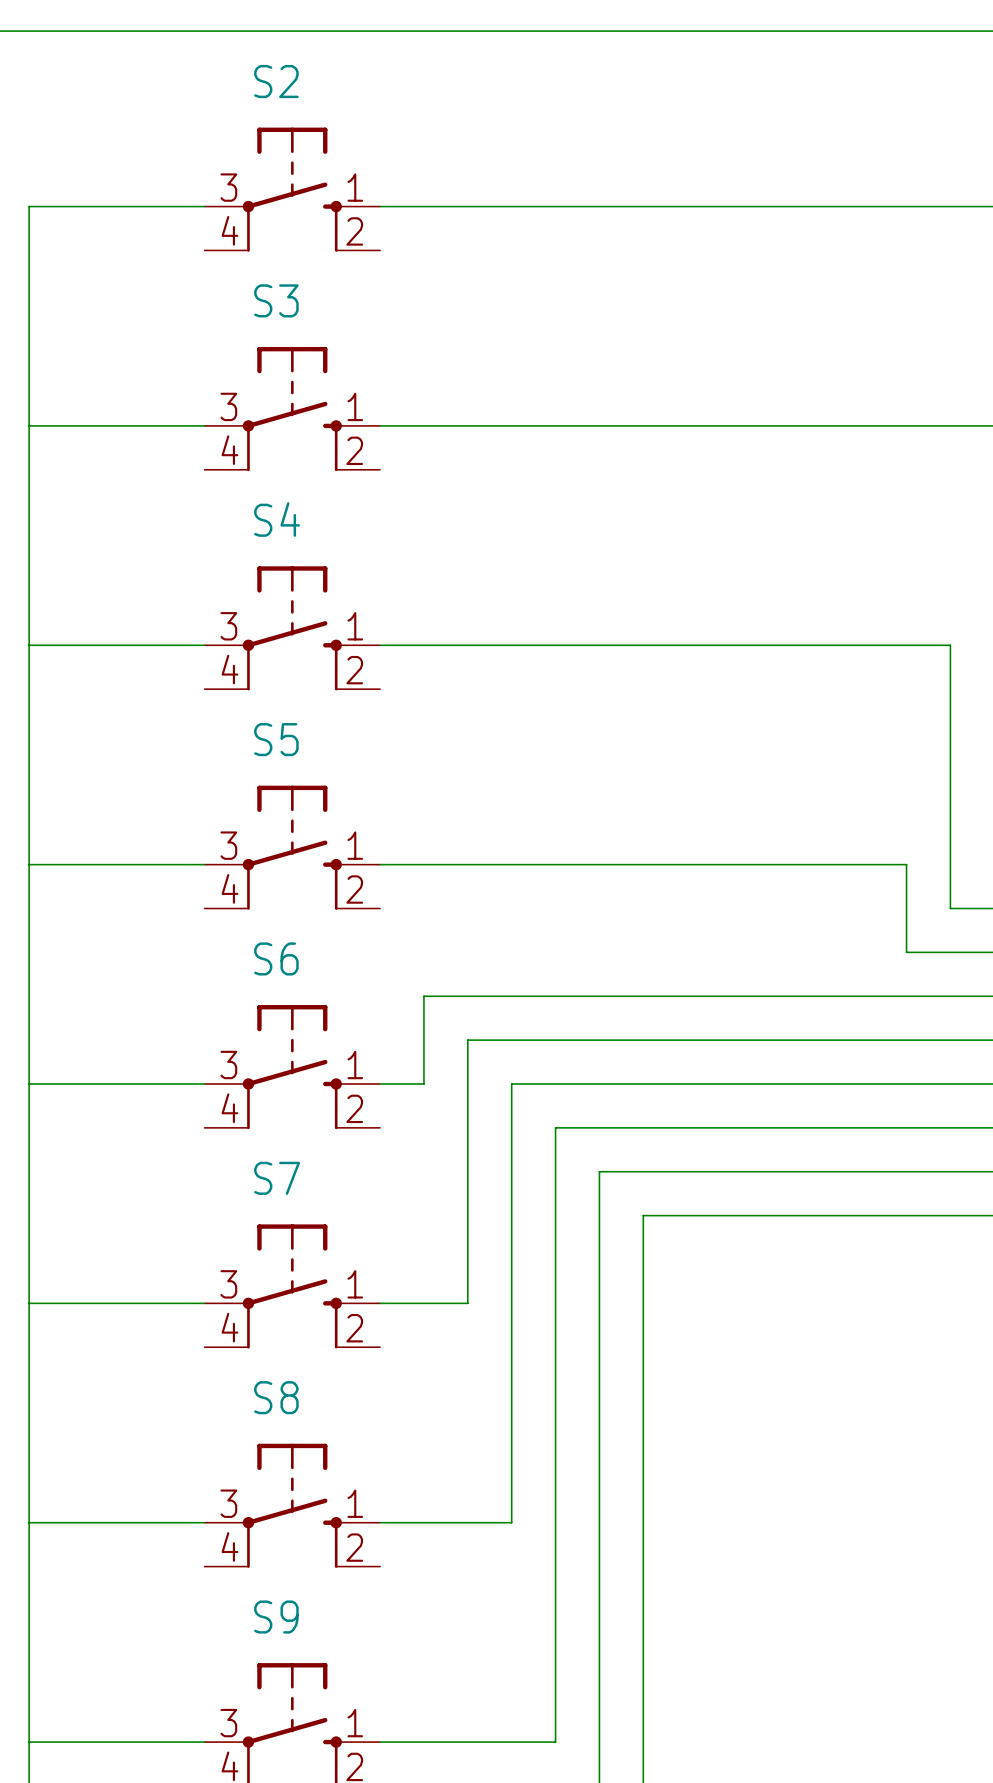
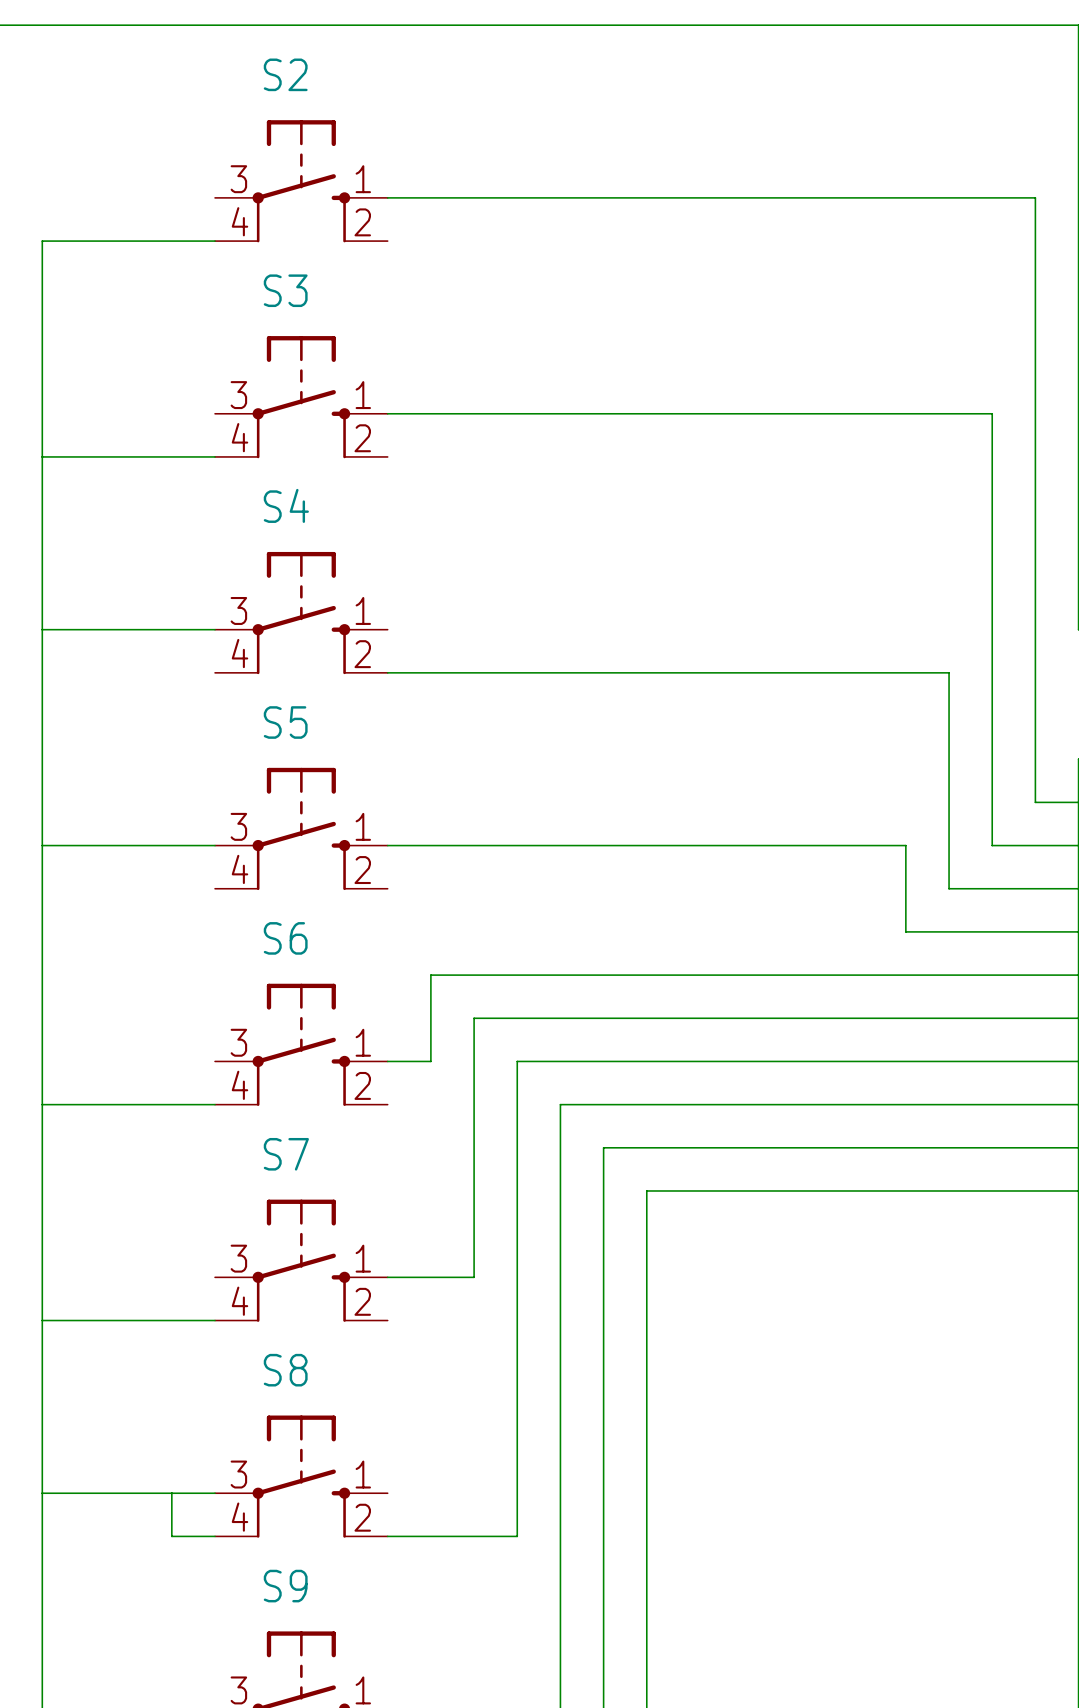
wire: (204, 206) (29, 206) (29, 250) -> (215, 241) (42, 241)
wire: (29, 425) (204, 425) -> (42, 456) (215, 456)
wire: (380, 645) (950, 645) (950, 689) -> (387, 672) (949, 672)
wire: (29, 1084) (204, 1084) -> (42, 1104) (215, 1104)
wire: (29, 1303) (204, 1303) -> (42, 1320) (215, 1320)
wire: none -> (171, 1493) (171, 1536) (215, 1536)
wire: (380, 1522) (511, 1522) -> (387, 1536) (517, 1536) (517, 1493)

